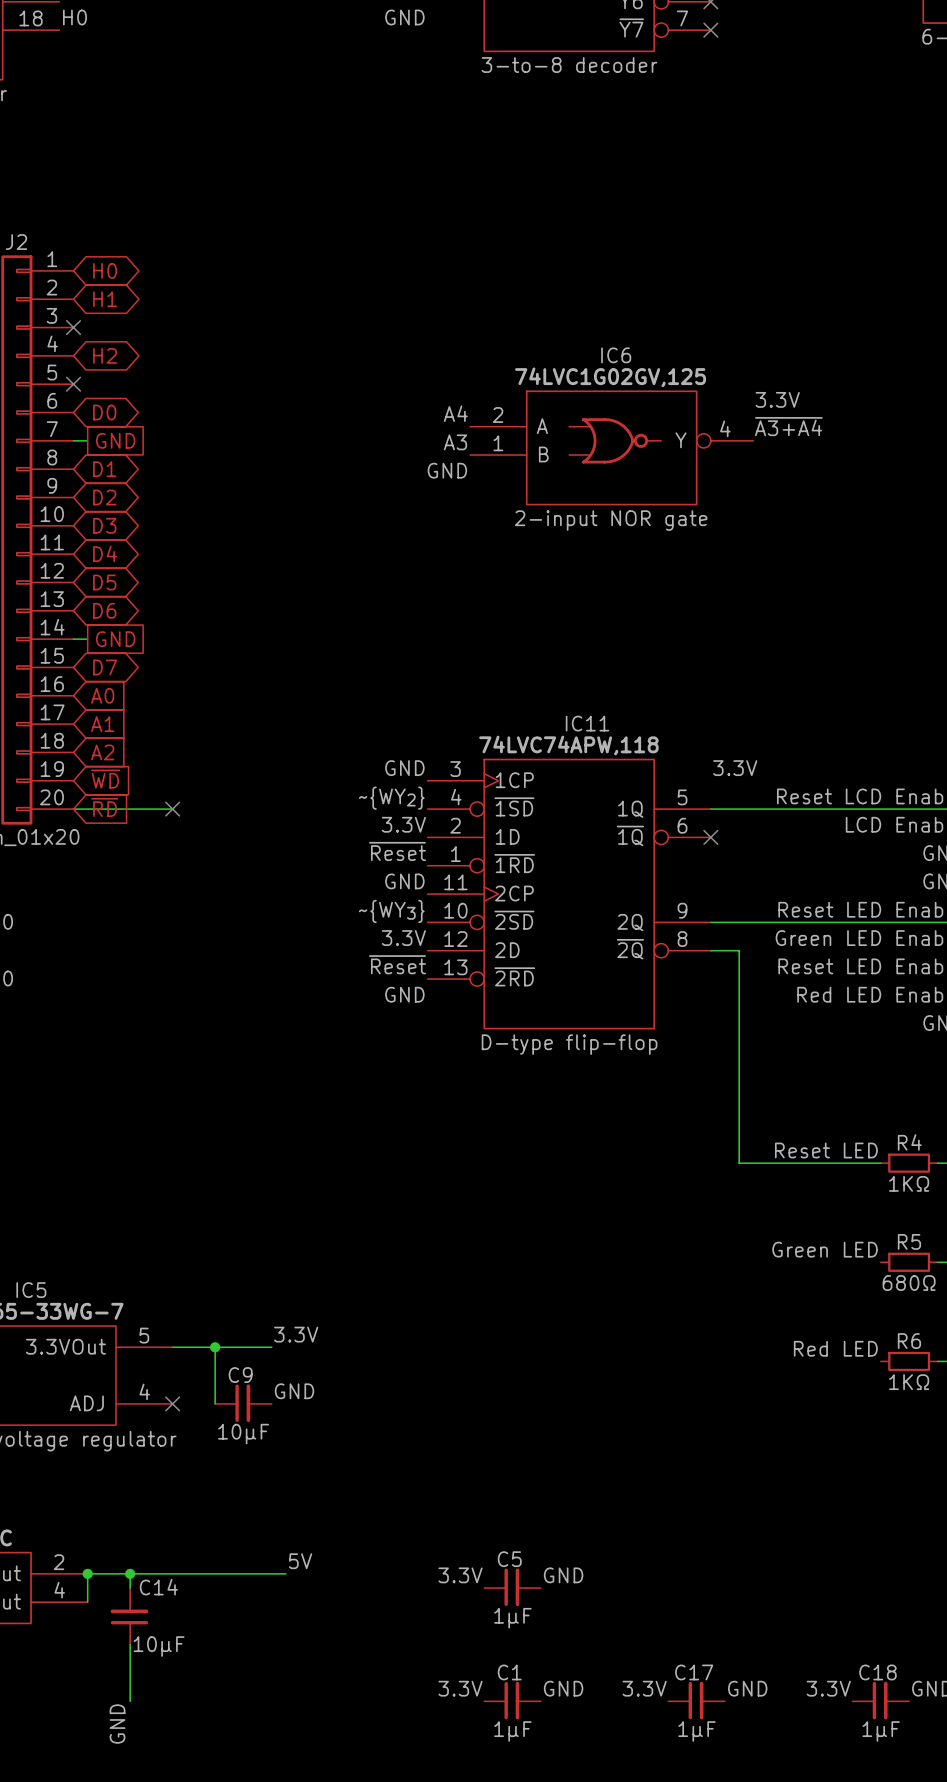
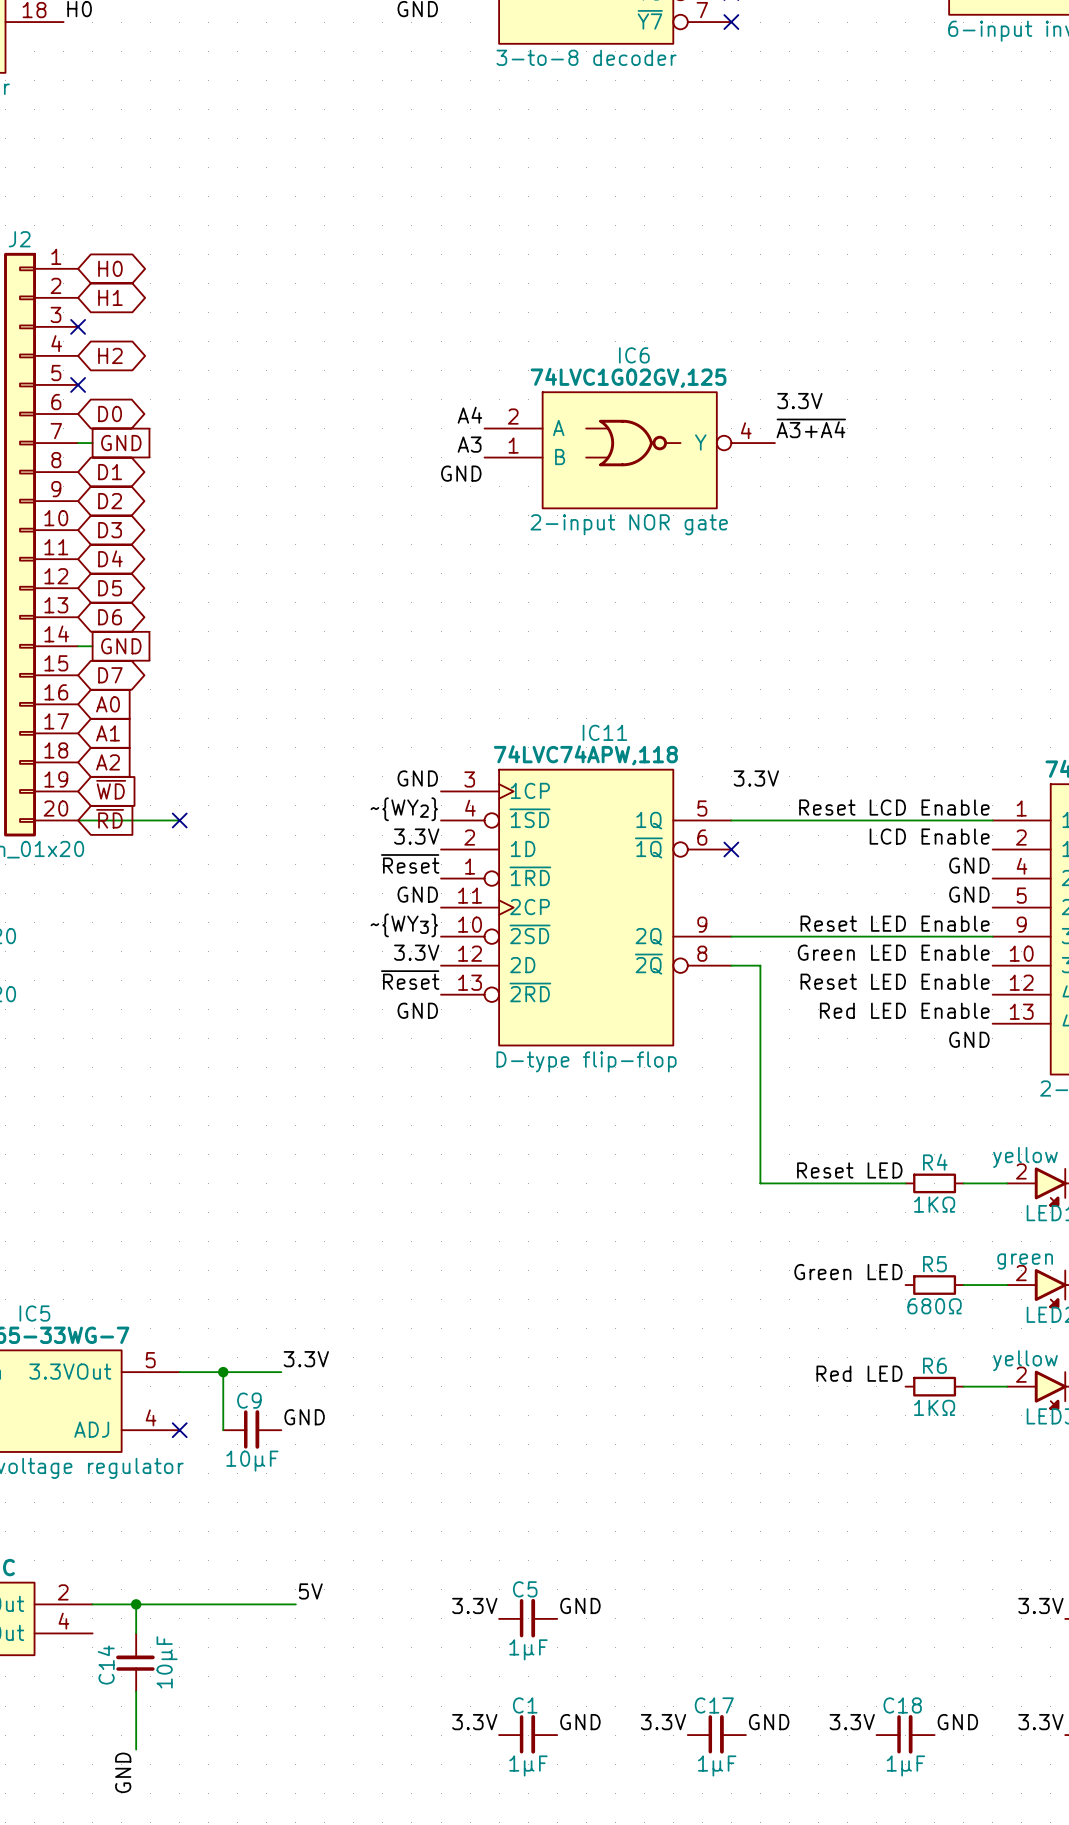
wire: (87, 1573) (87, 1602) -> none
junction: (87, 1573) -> none
C14 name rotation: 0° (158, 1587) -> 90° counterclockwise (106, 1665)
C14 name position: C14 (158, 1587) -> C14 (106, 1665)
C14 position: (129, 1616) -> (135, 1662)
C14 value rotation: 0° (159, 1646) -> 90° counterclockwise (167, 1662)
wire: none -> (136, 1735) (136, 1749)
label position: GND (117, 1724) -> GND (123, 1772)

